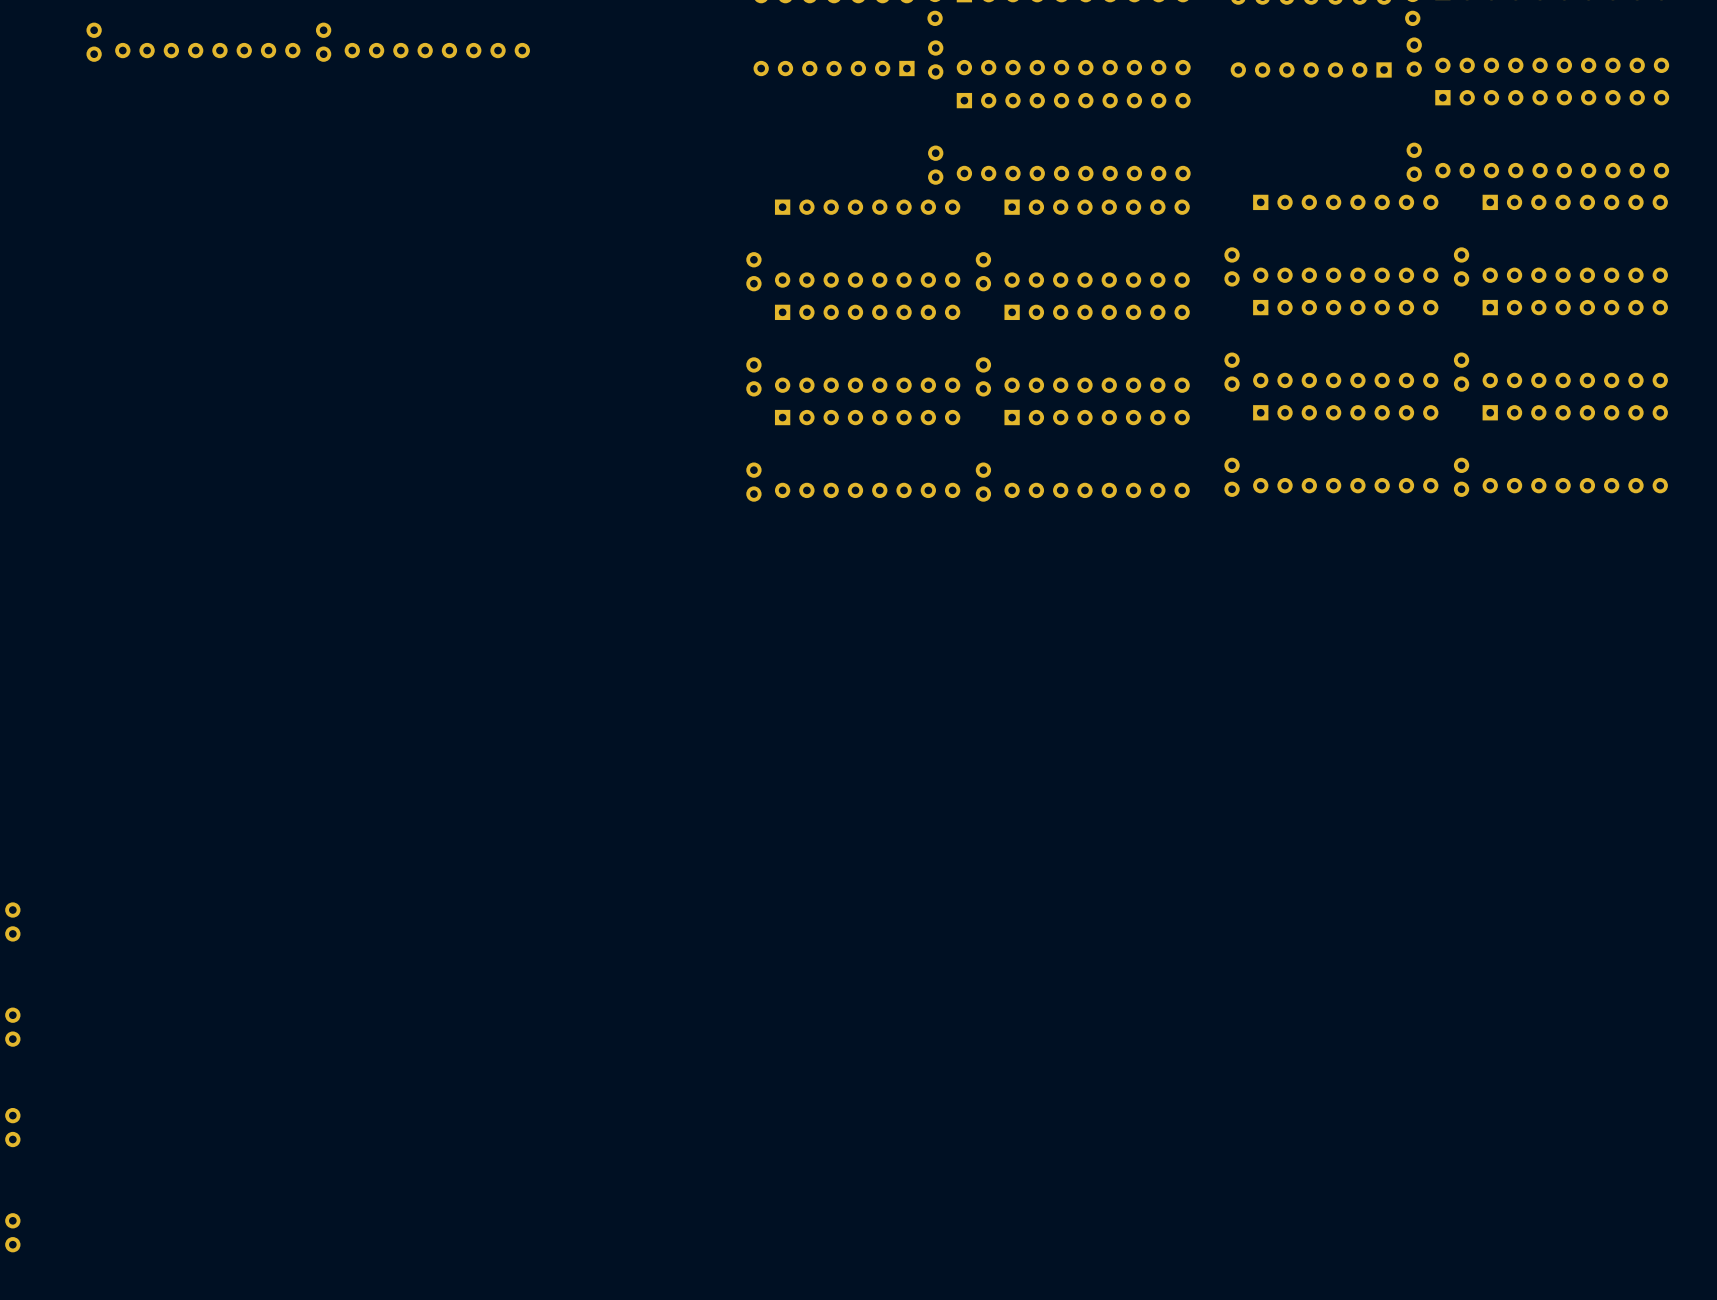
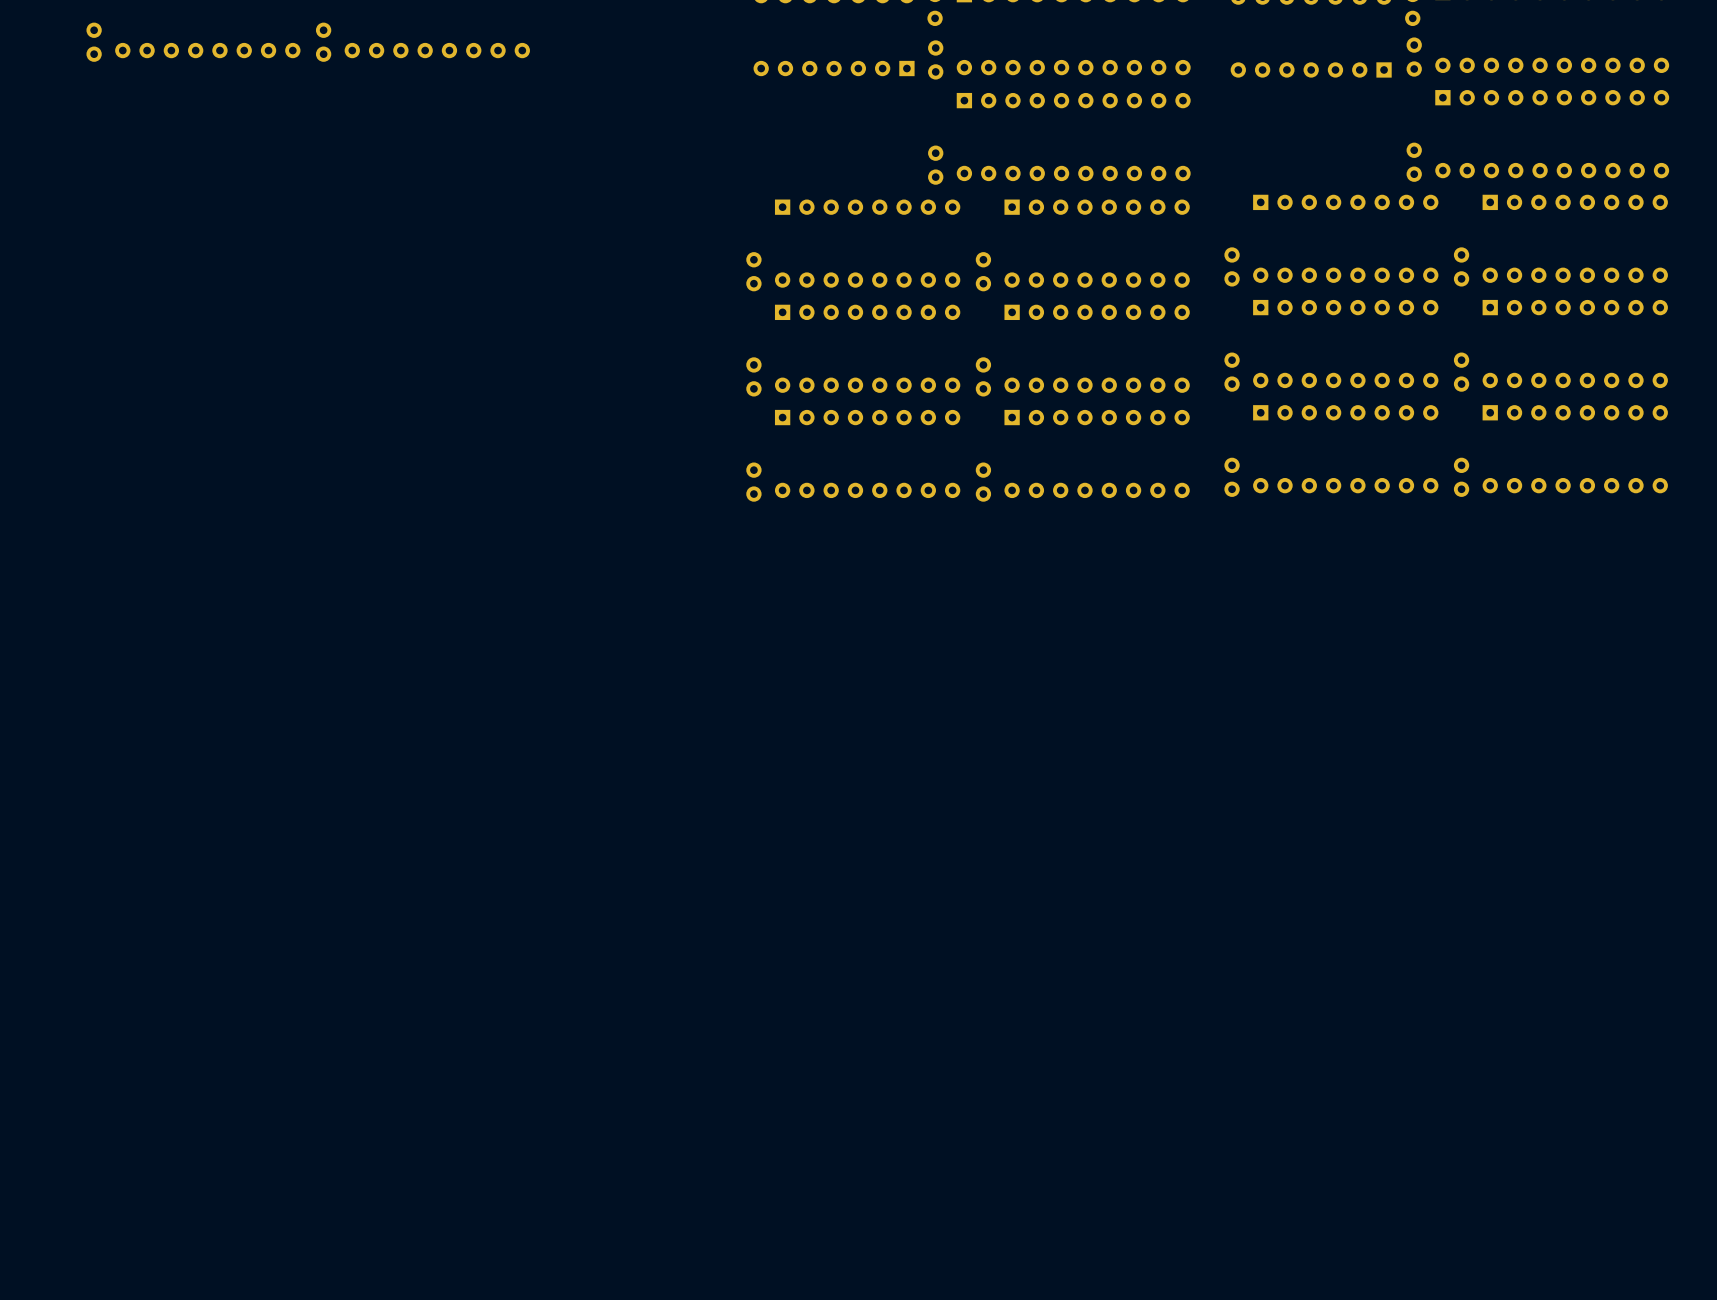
part: (12, 921) -> none
part: (12, 1027) -> none
part: (12, 1127) -> none
part: (12, 1232) -> none

